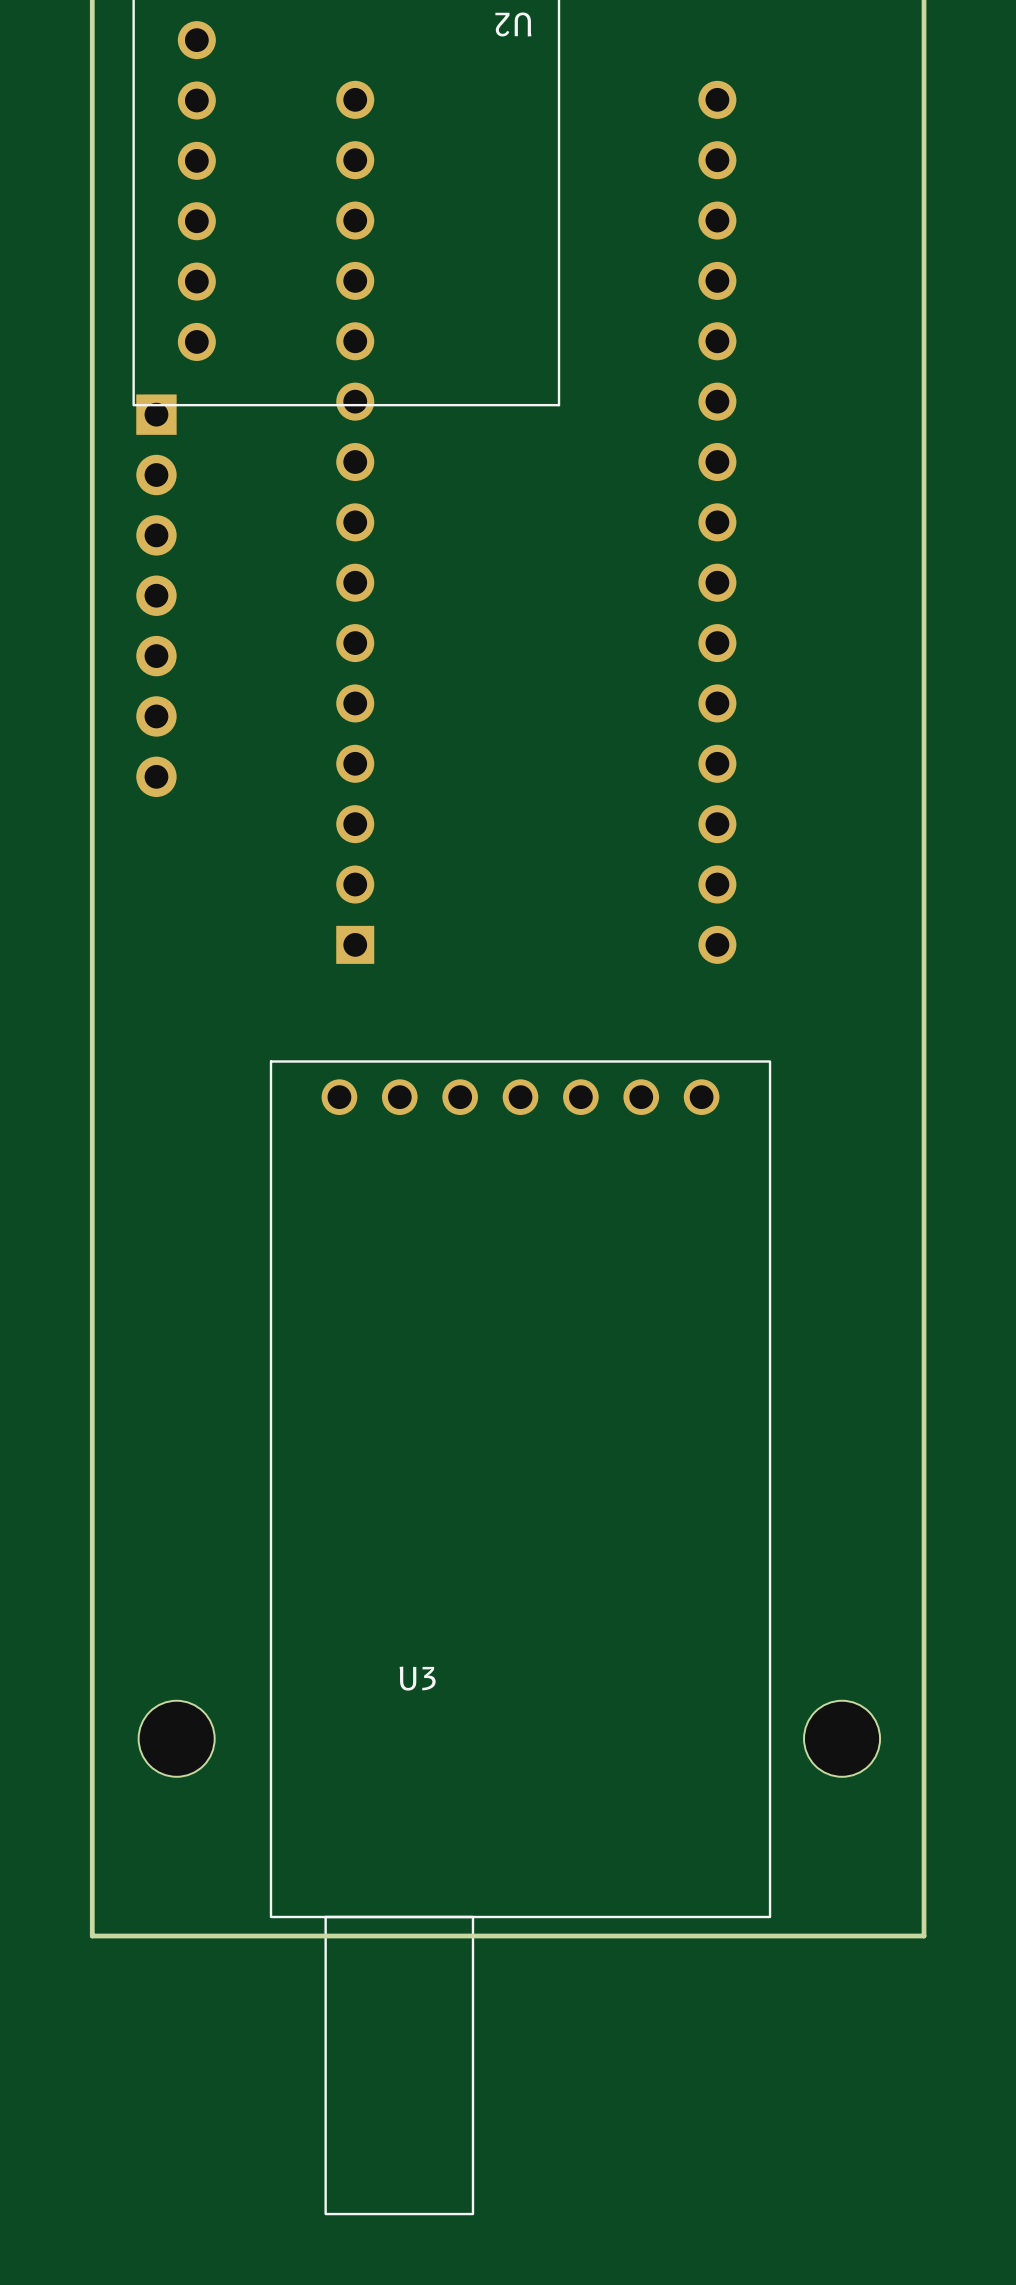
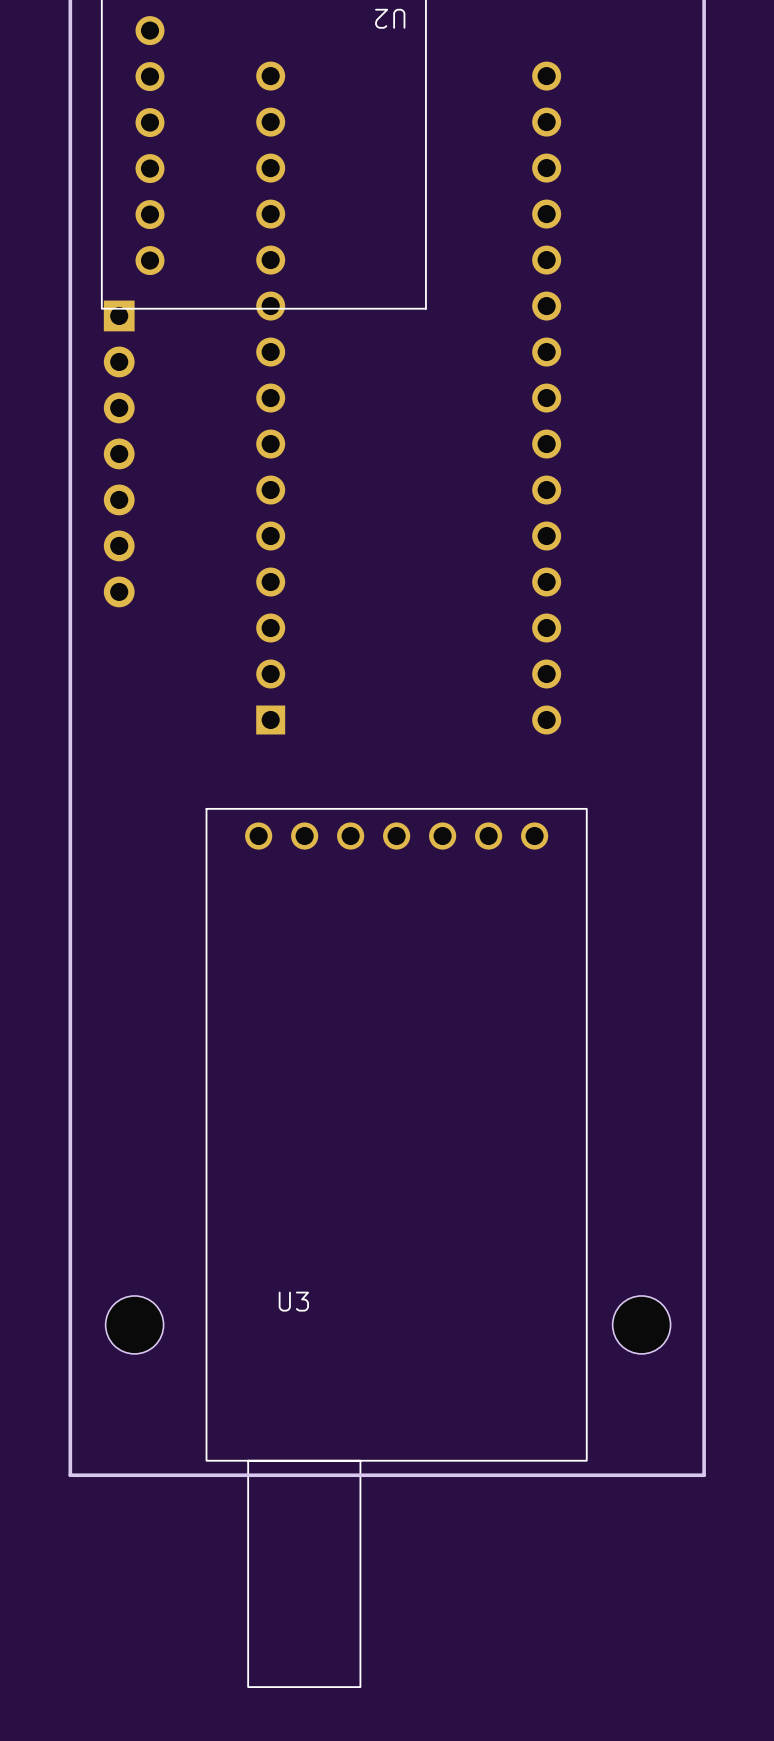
U3 name position: U3 (417, 1678) -> U3 (293, 1301)

